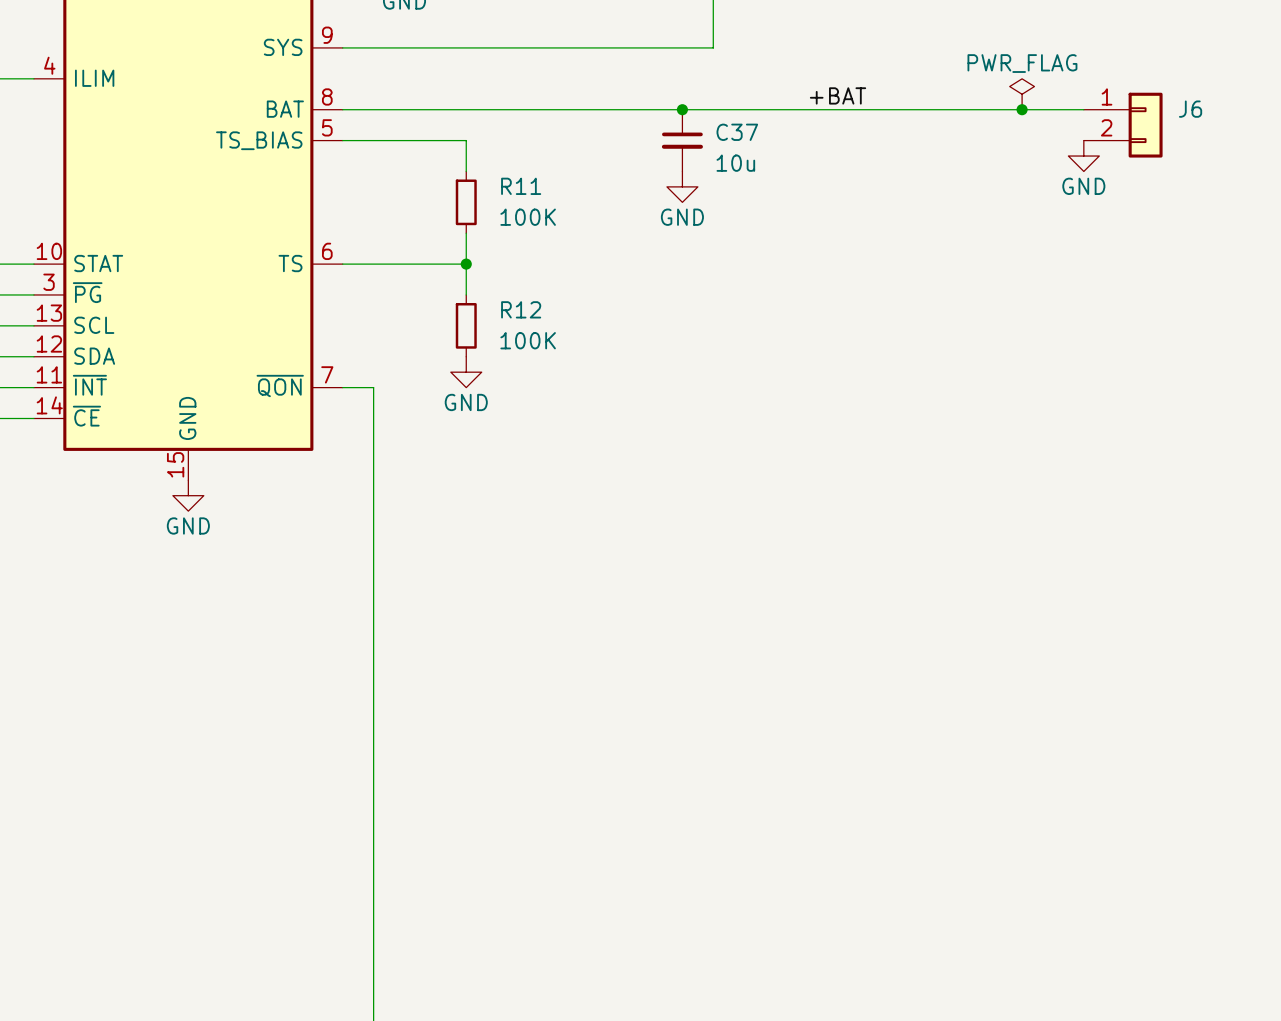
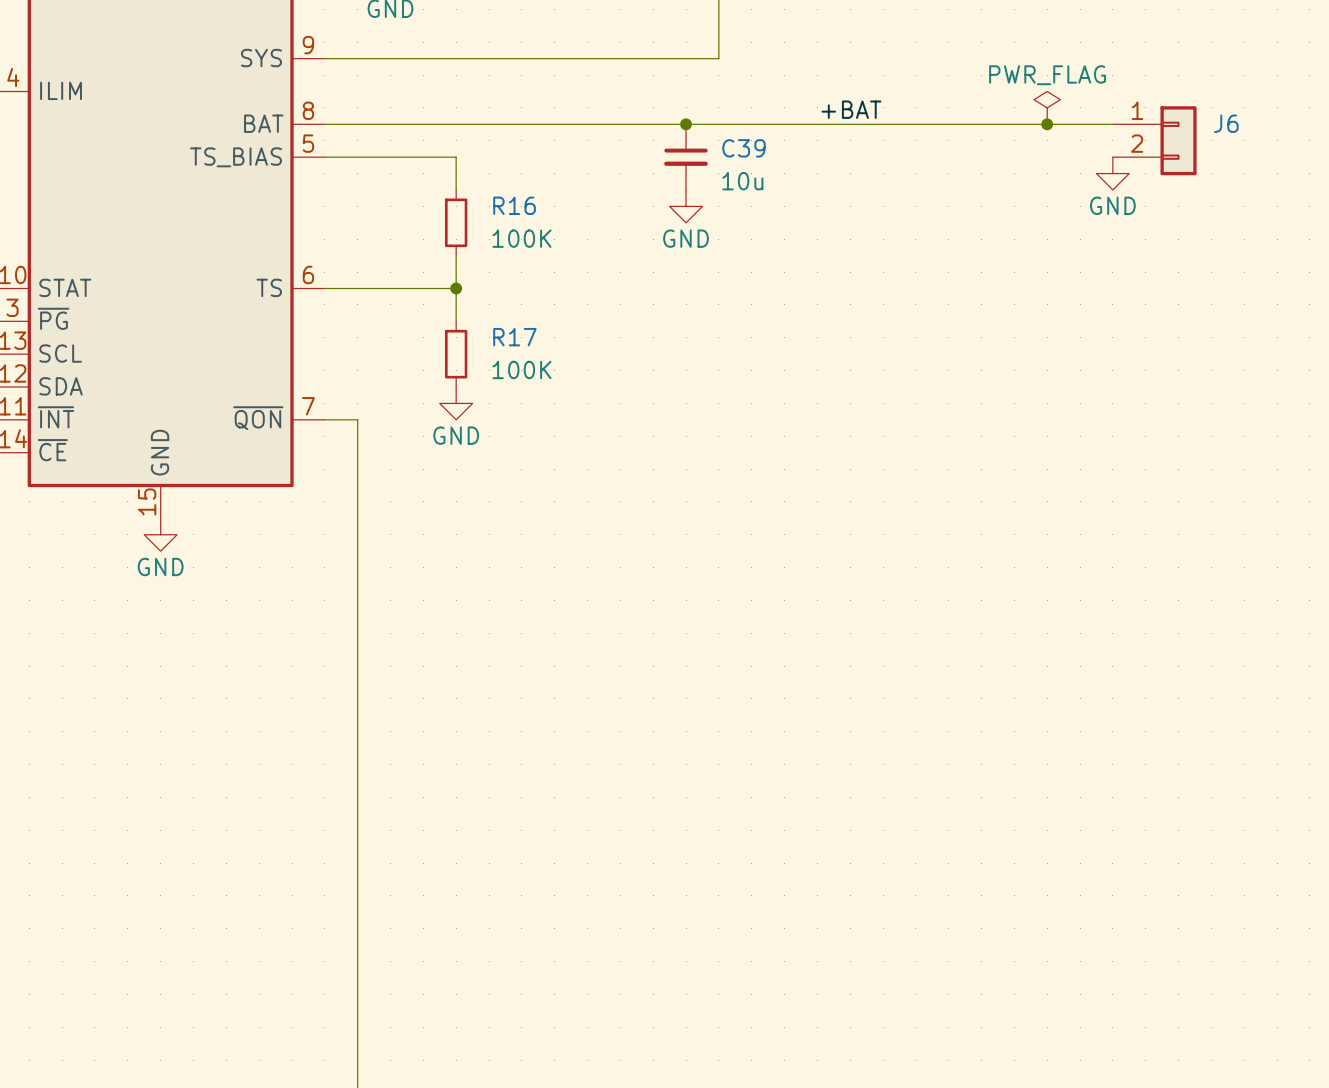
C37 name: C37 (737, 132) -> C39 (743, 148)
R11 name: R11 (521, 186) -> R16 (514, 205)
R12 name: R12 (521, 309) -> R17 (514, 337)

